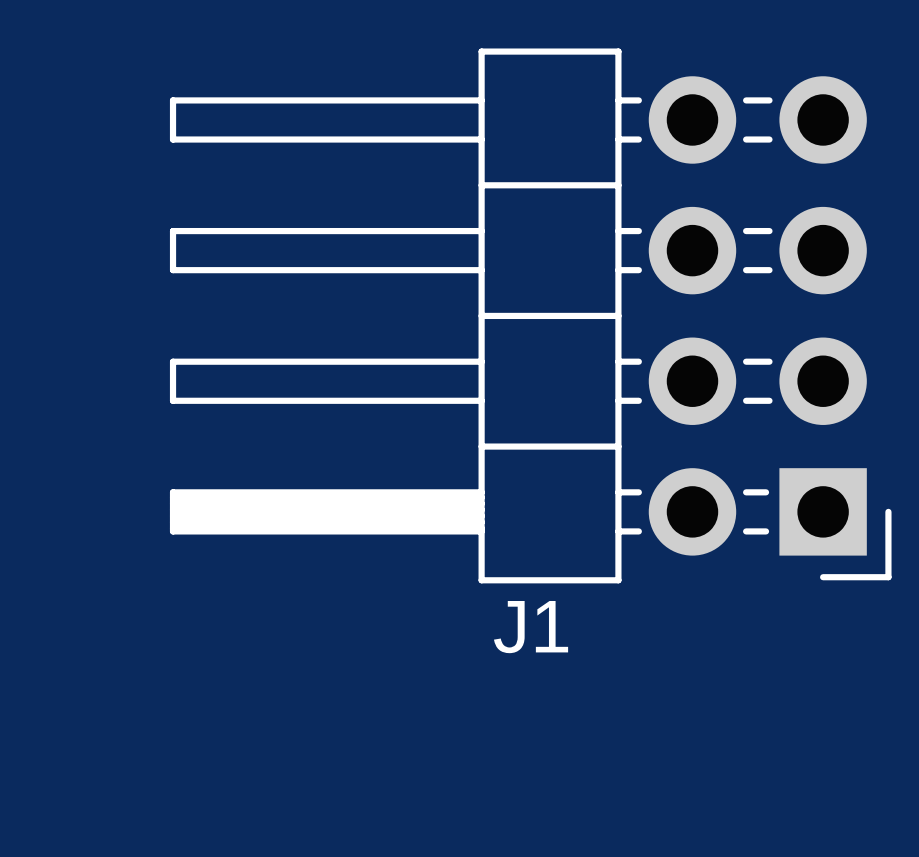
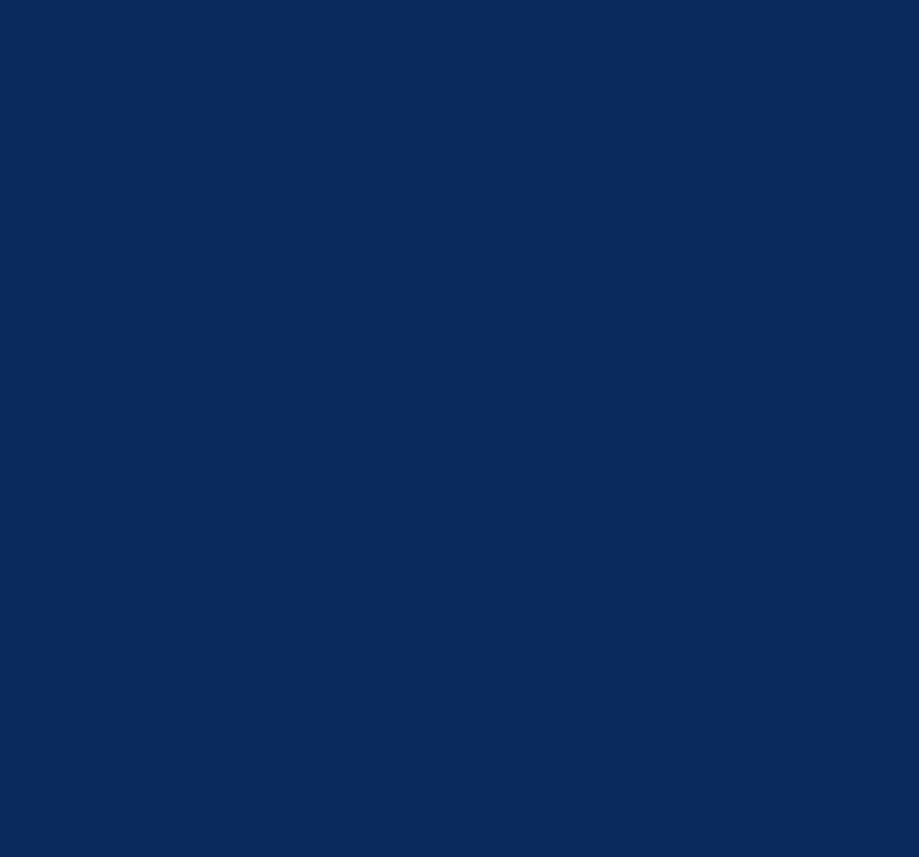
J1: (530, 315) -> none

